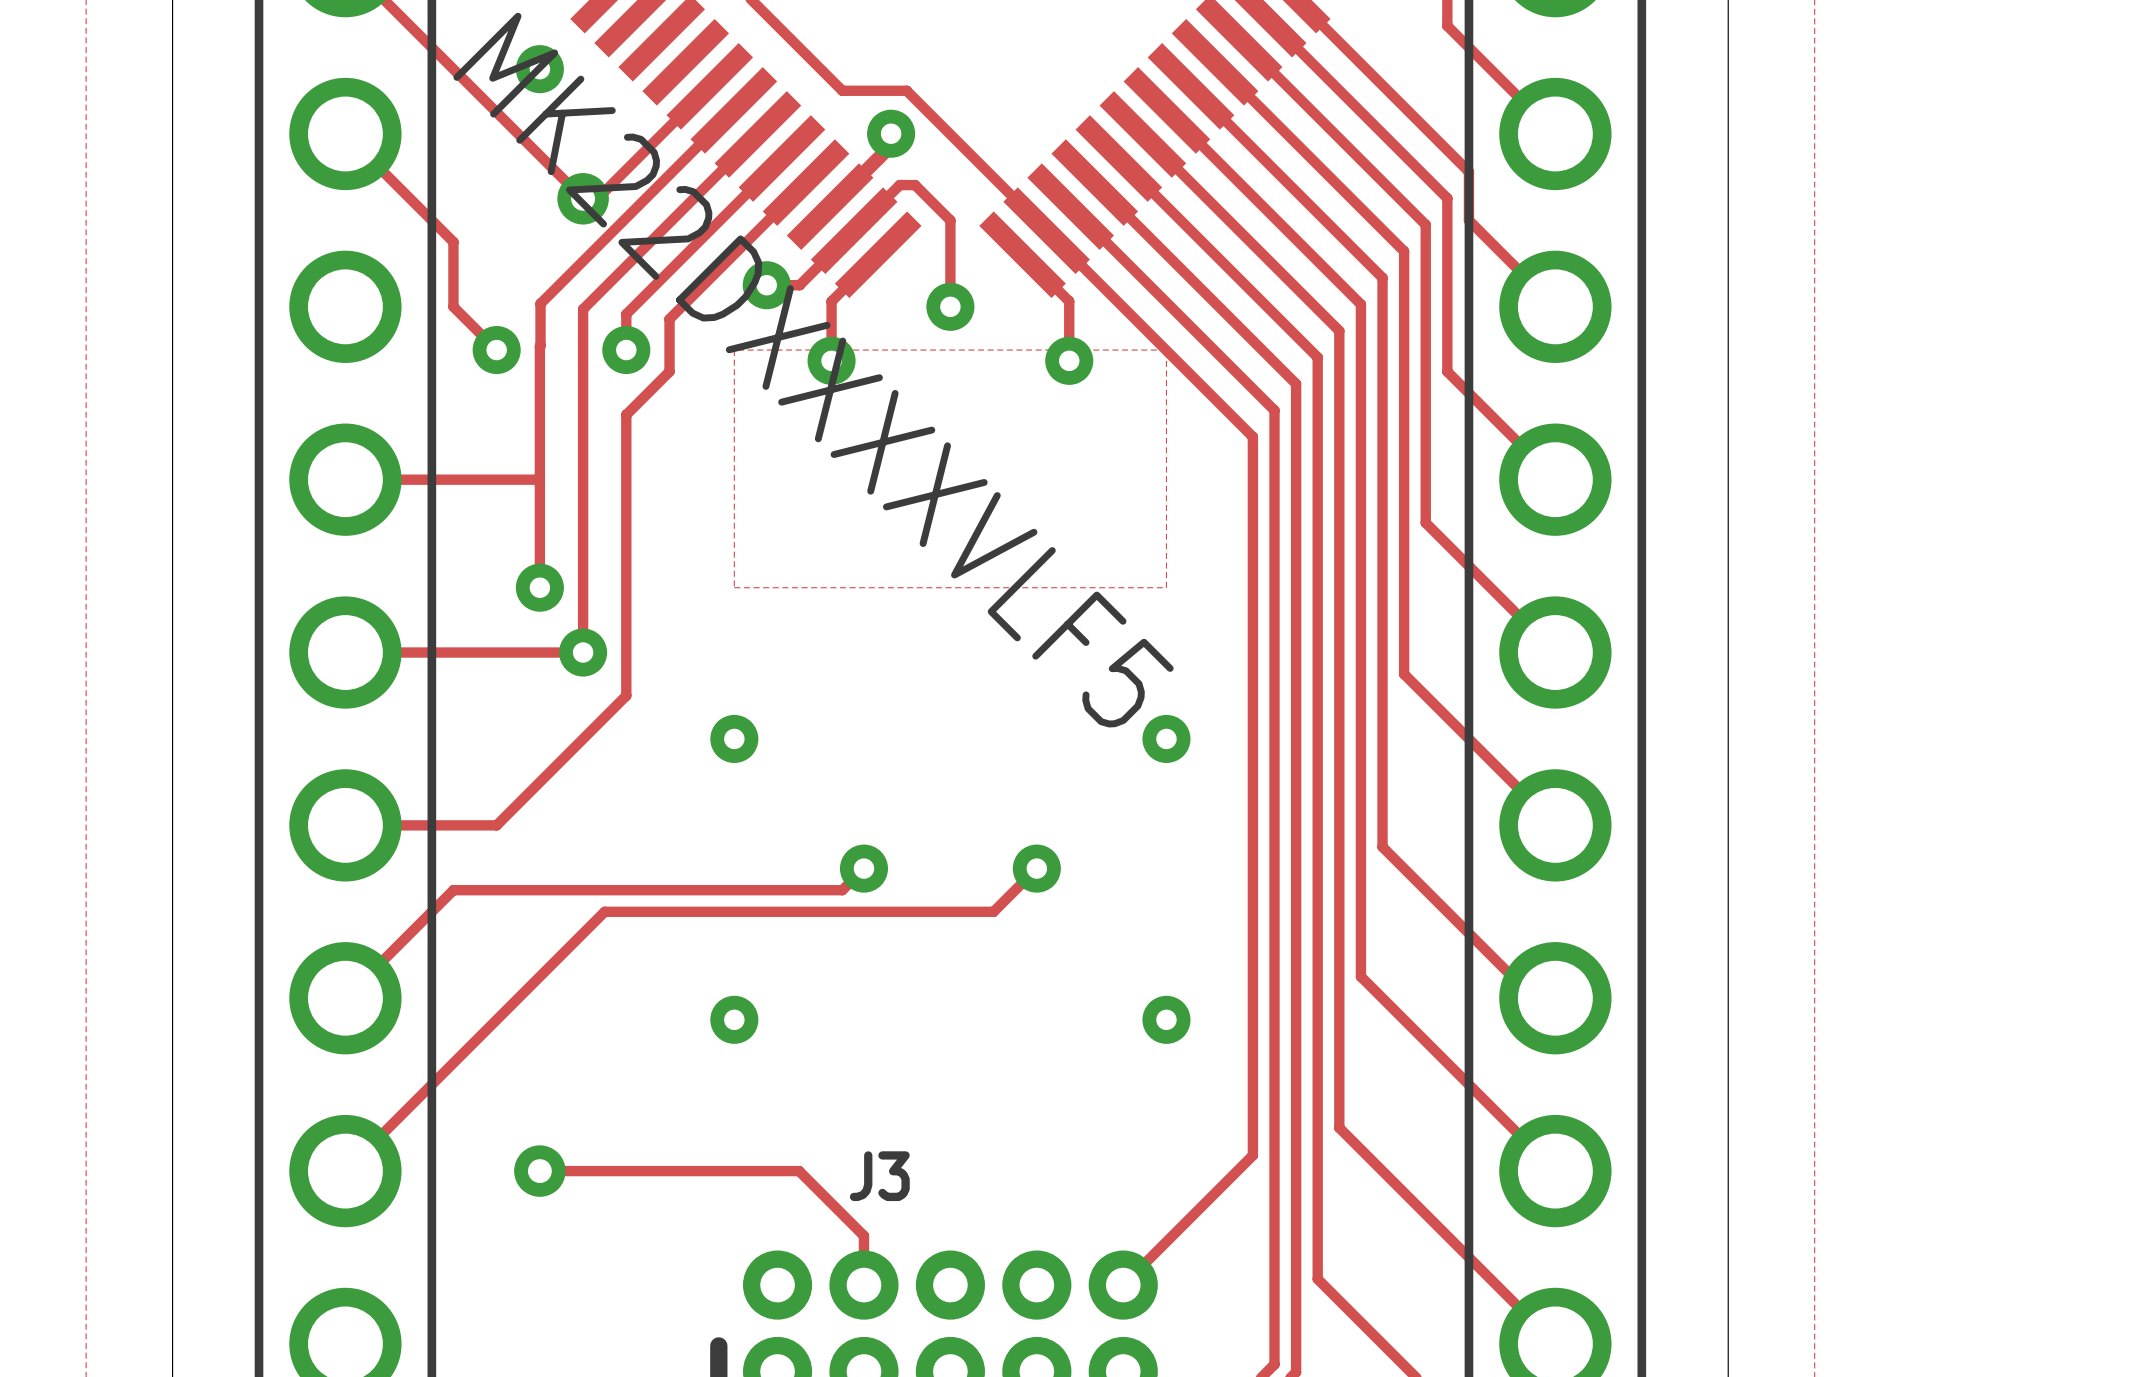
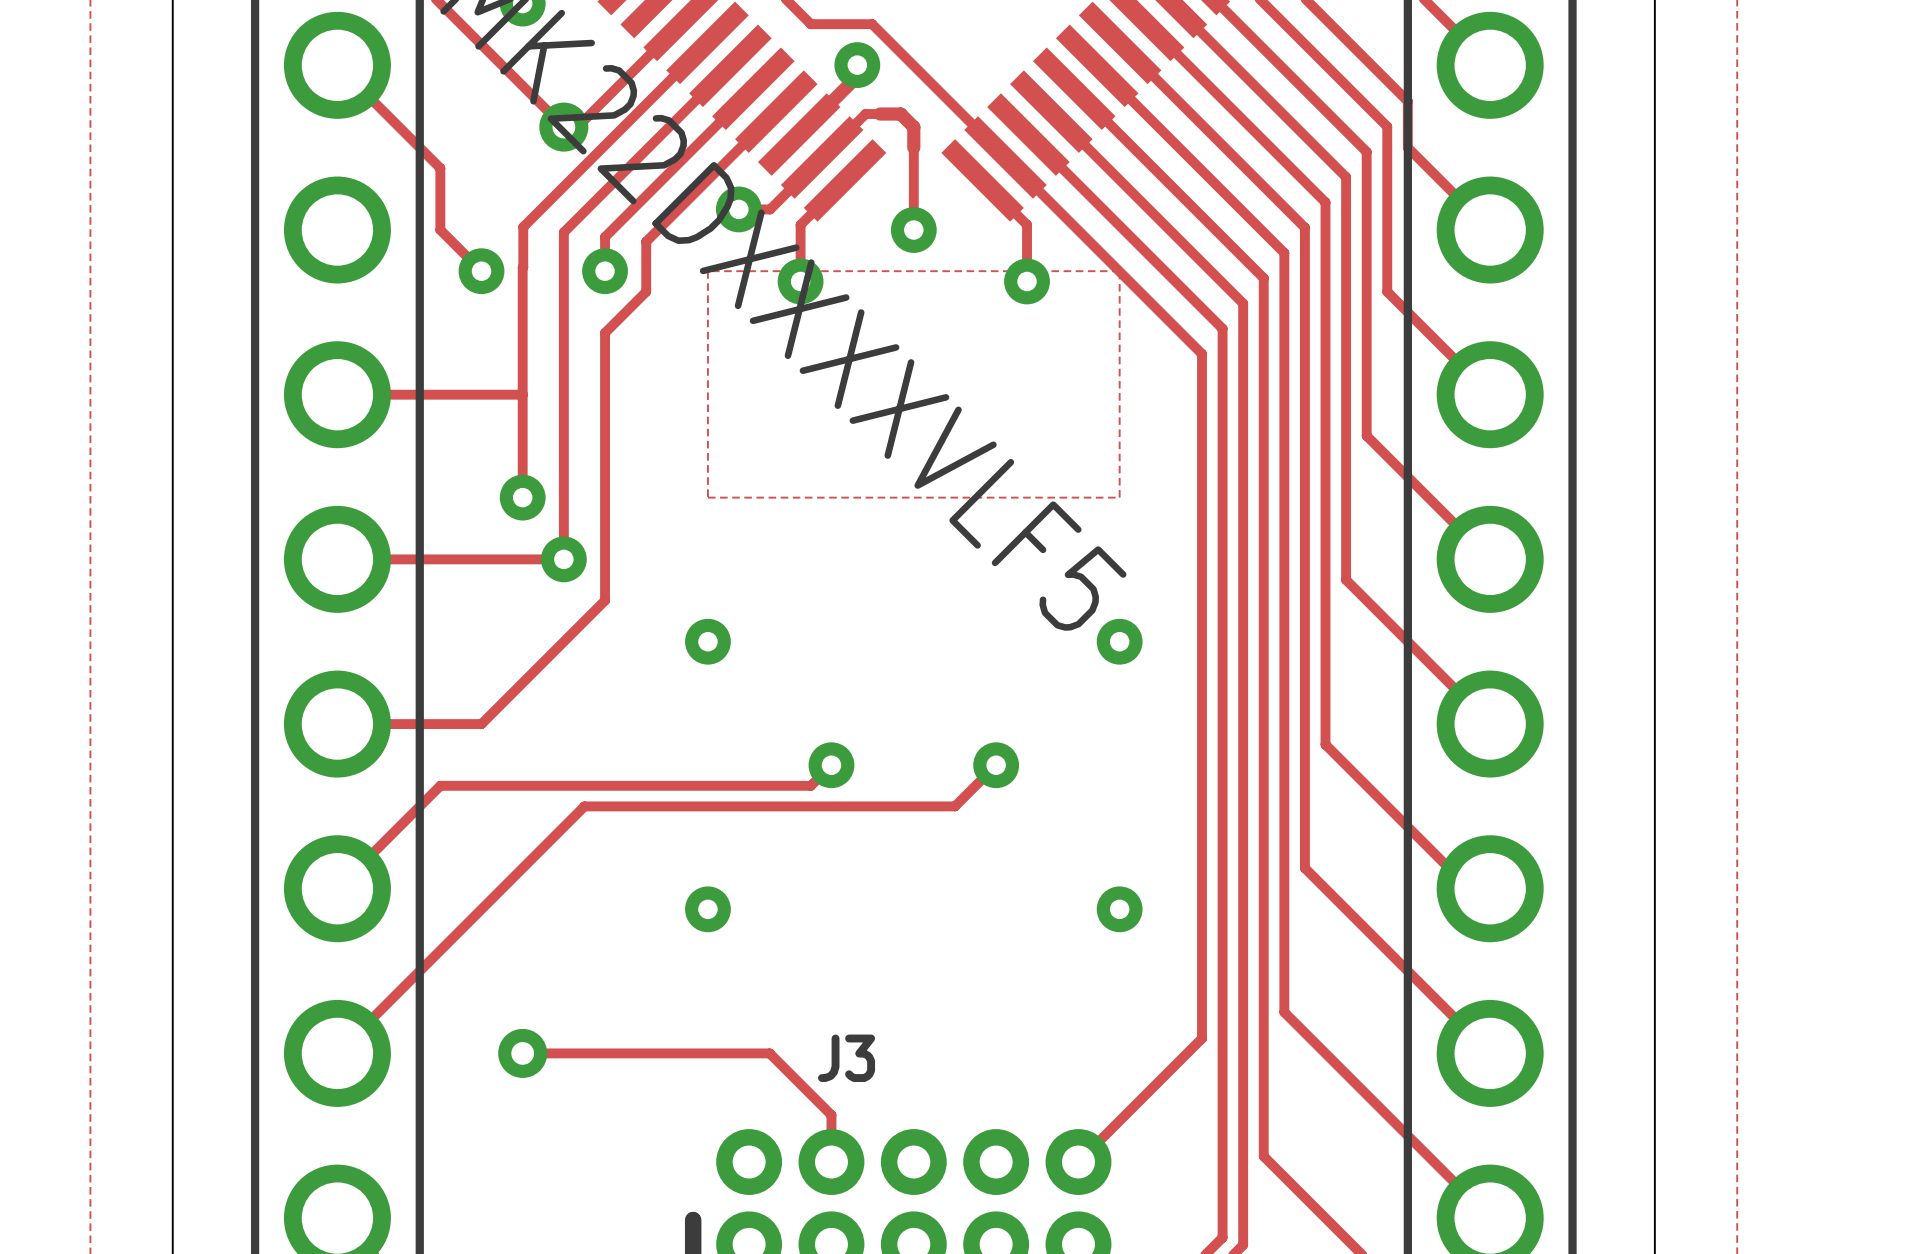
track: (915, 185) (950, 220) -> (880, 114) (900, 114) (913, 127) (913, 147)

